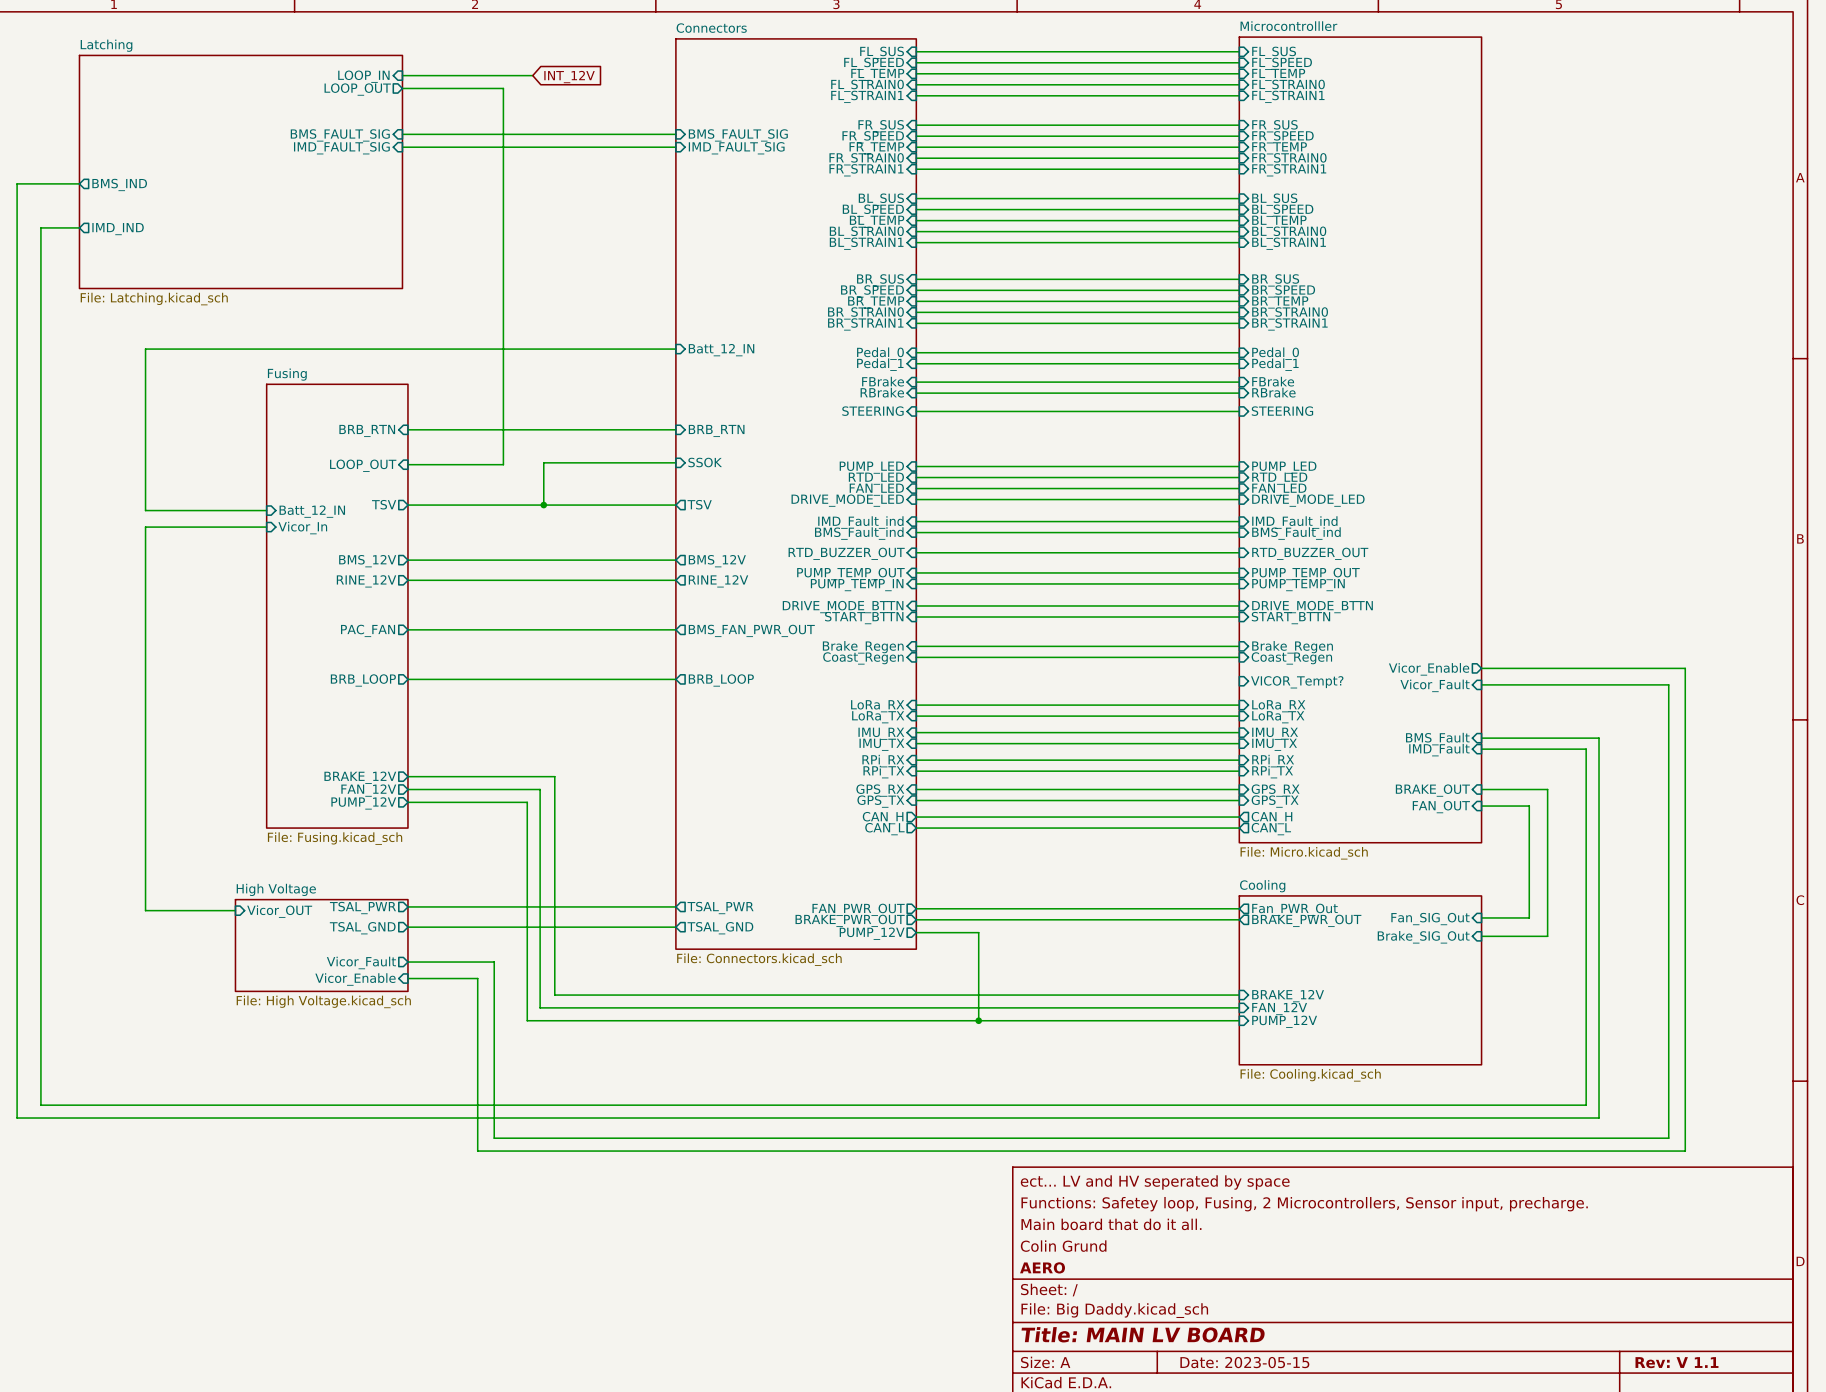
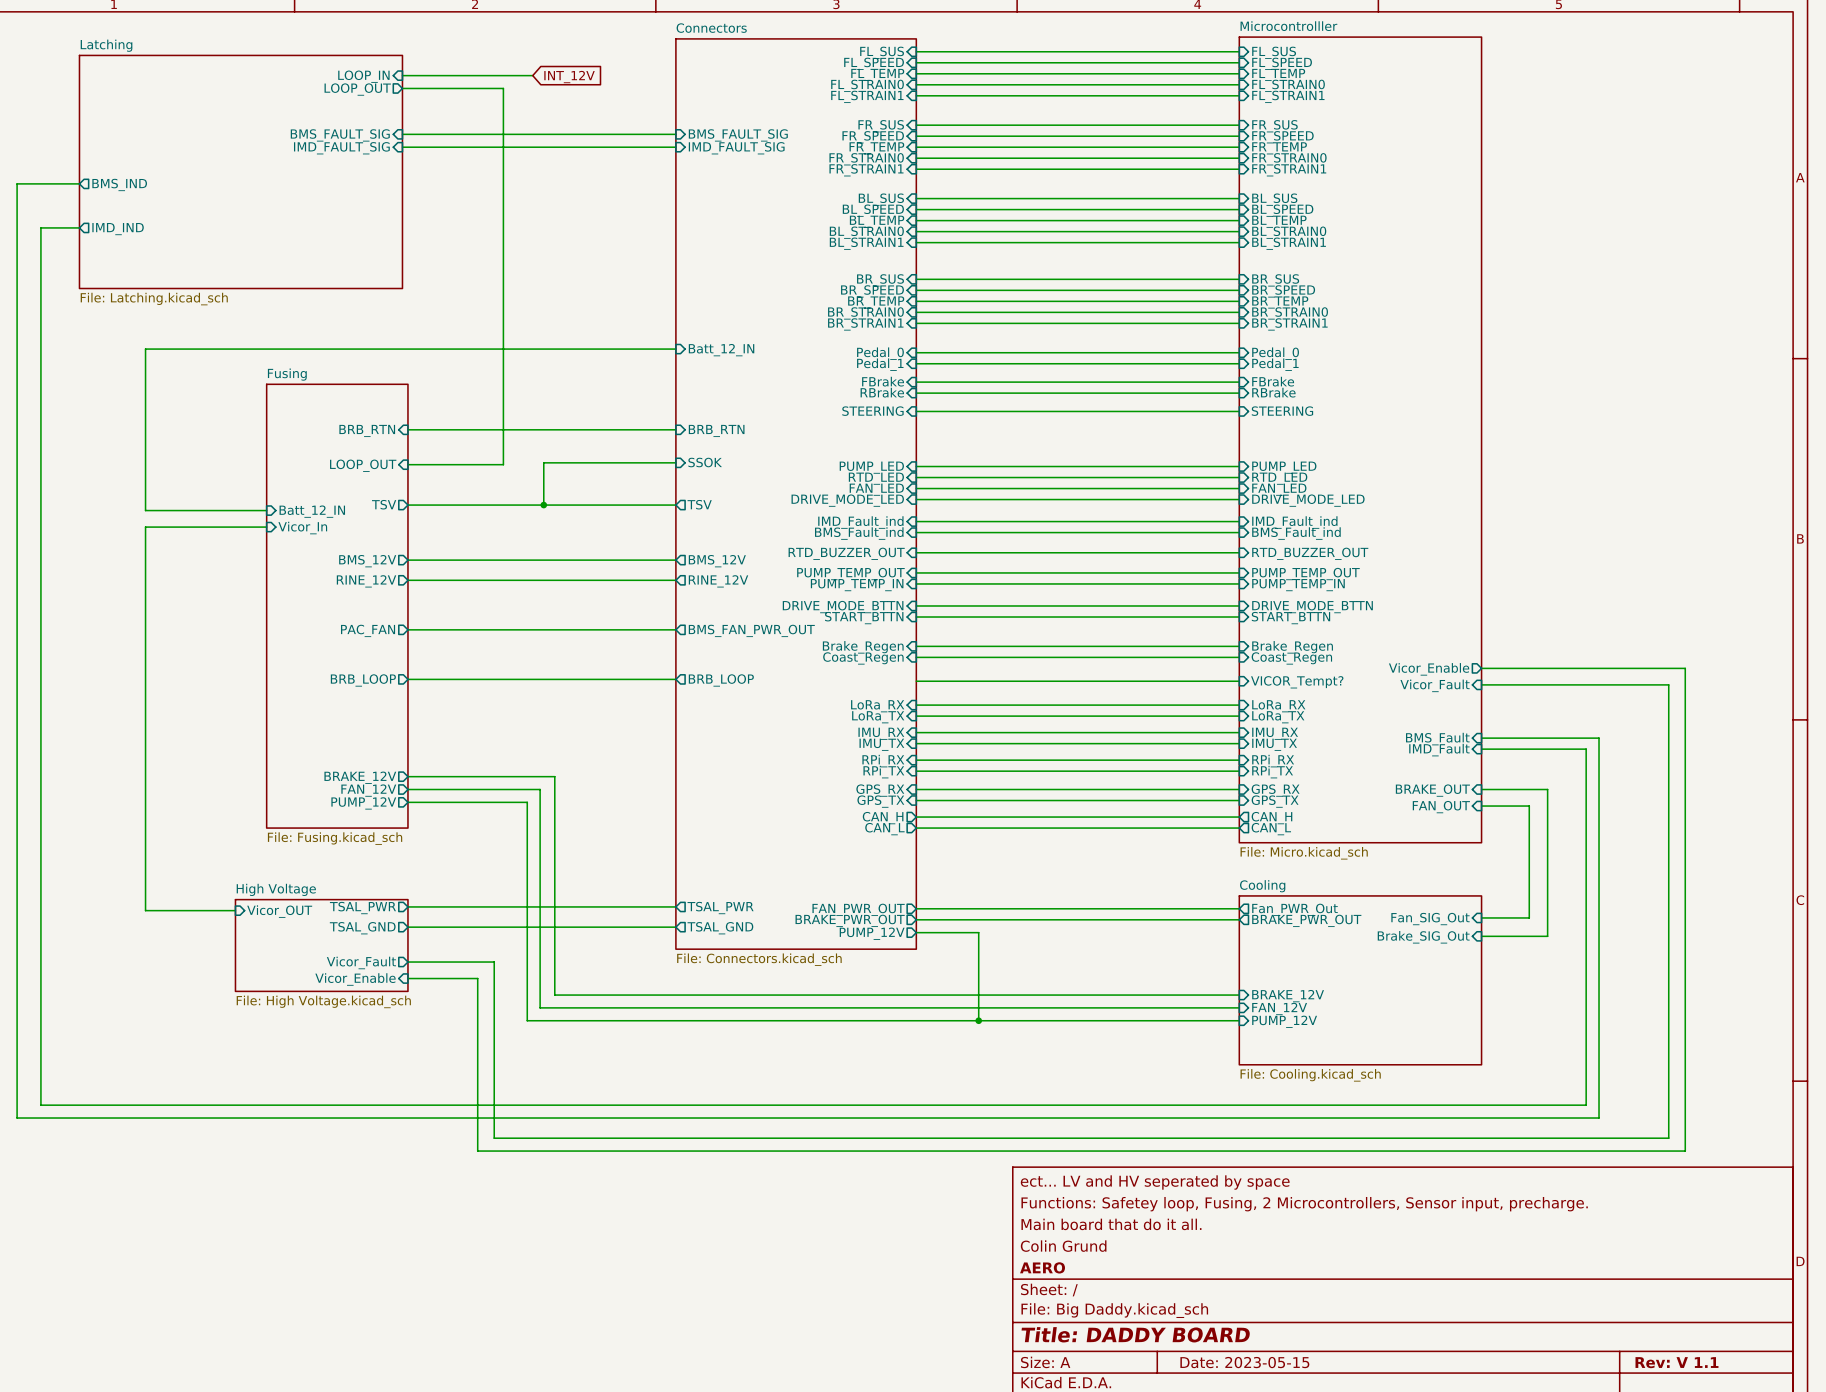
wire: none -> (916, 681) (1239, 681)
title block: Title: MAIN LV BOARD (1143, 1334) -> Title: DADDY BOARD (1135, 1334)

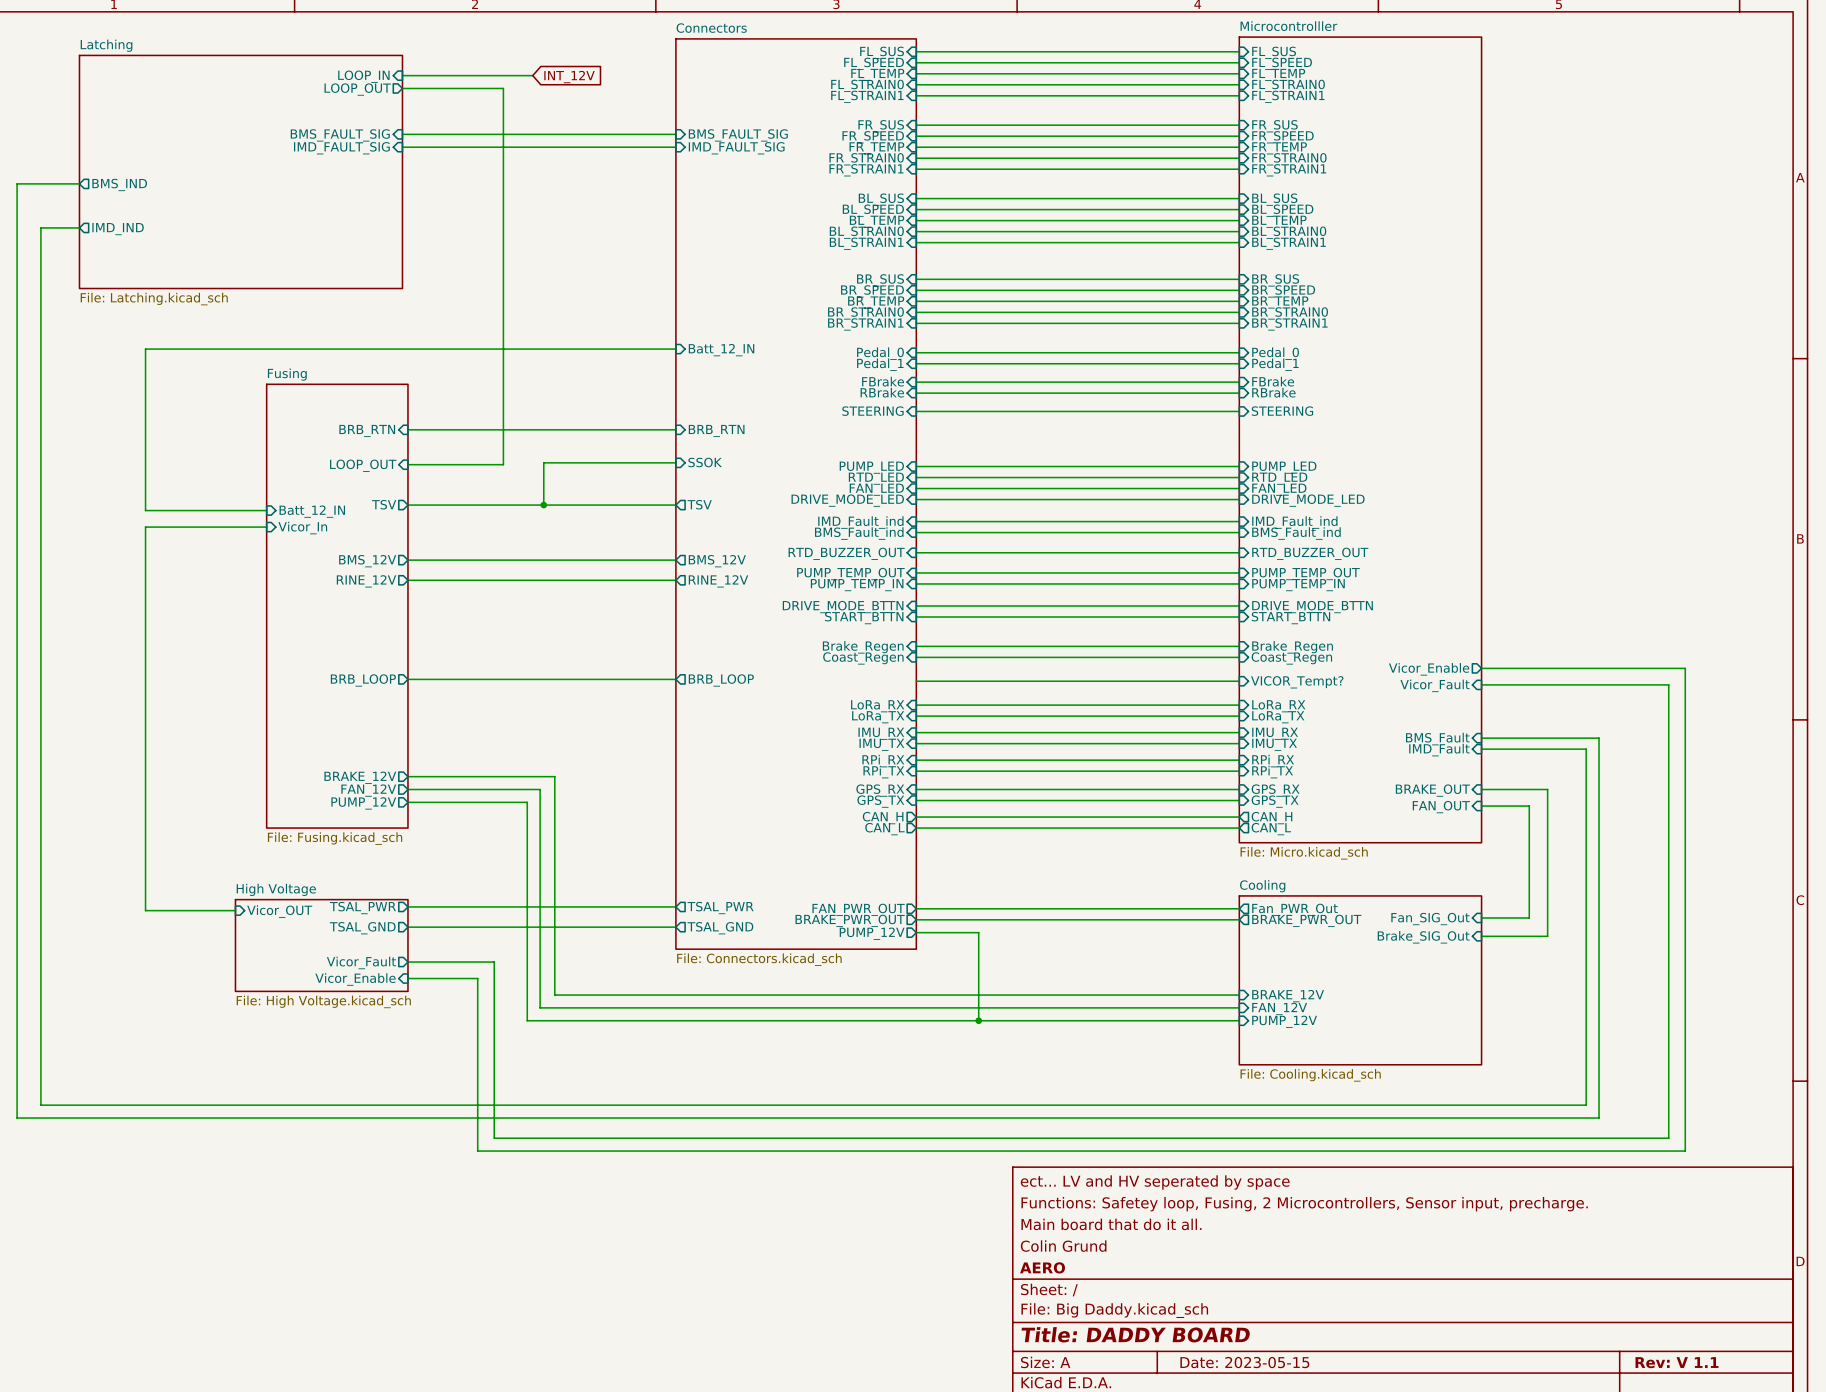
wire: (407, 629) (675, 629) -> none
sheet pin: PAC_FAN (368, 630) -> none
sheet pin: BMS_FAN_PWR_OUT (751, 630) -> none

